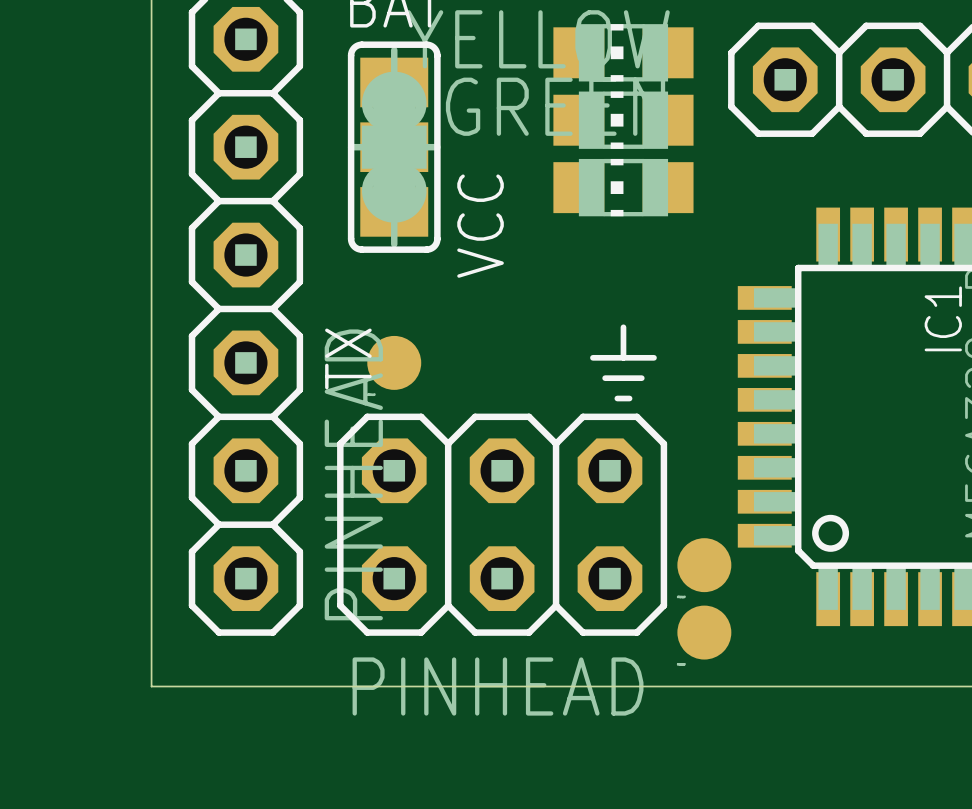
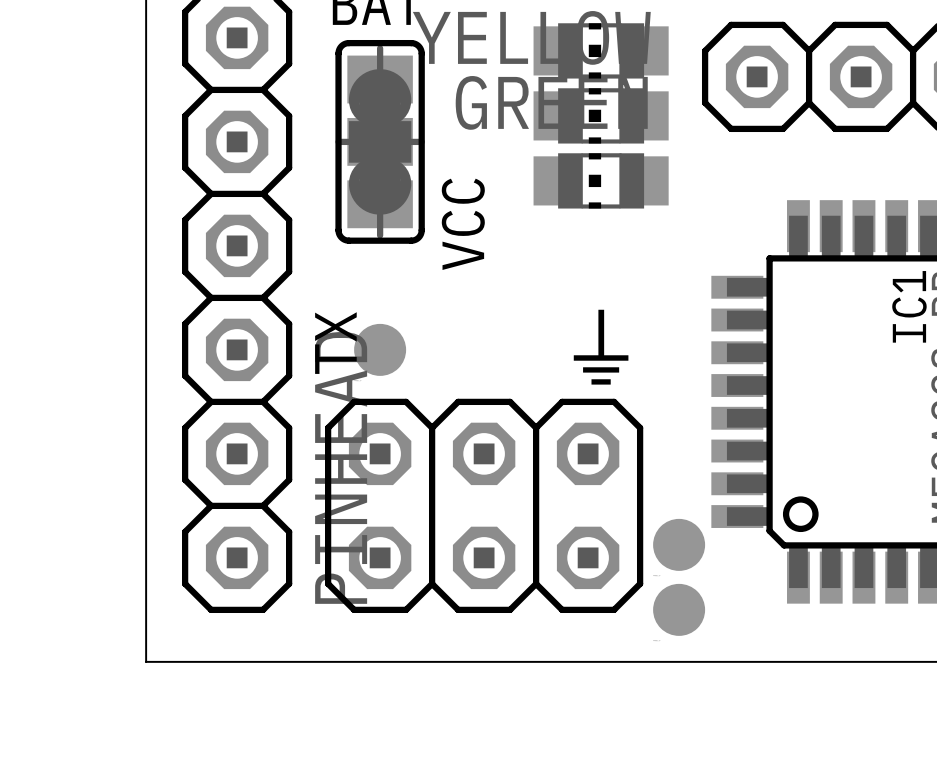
part value: PINHEAD (498, 686) -> none

